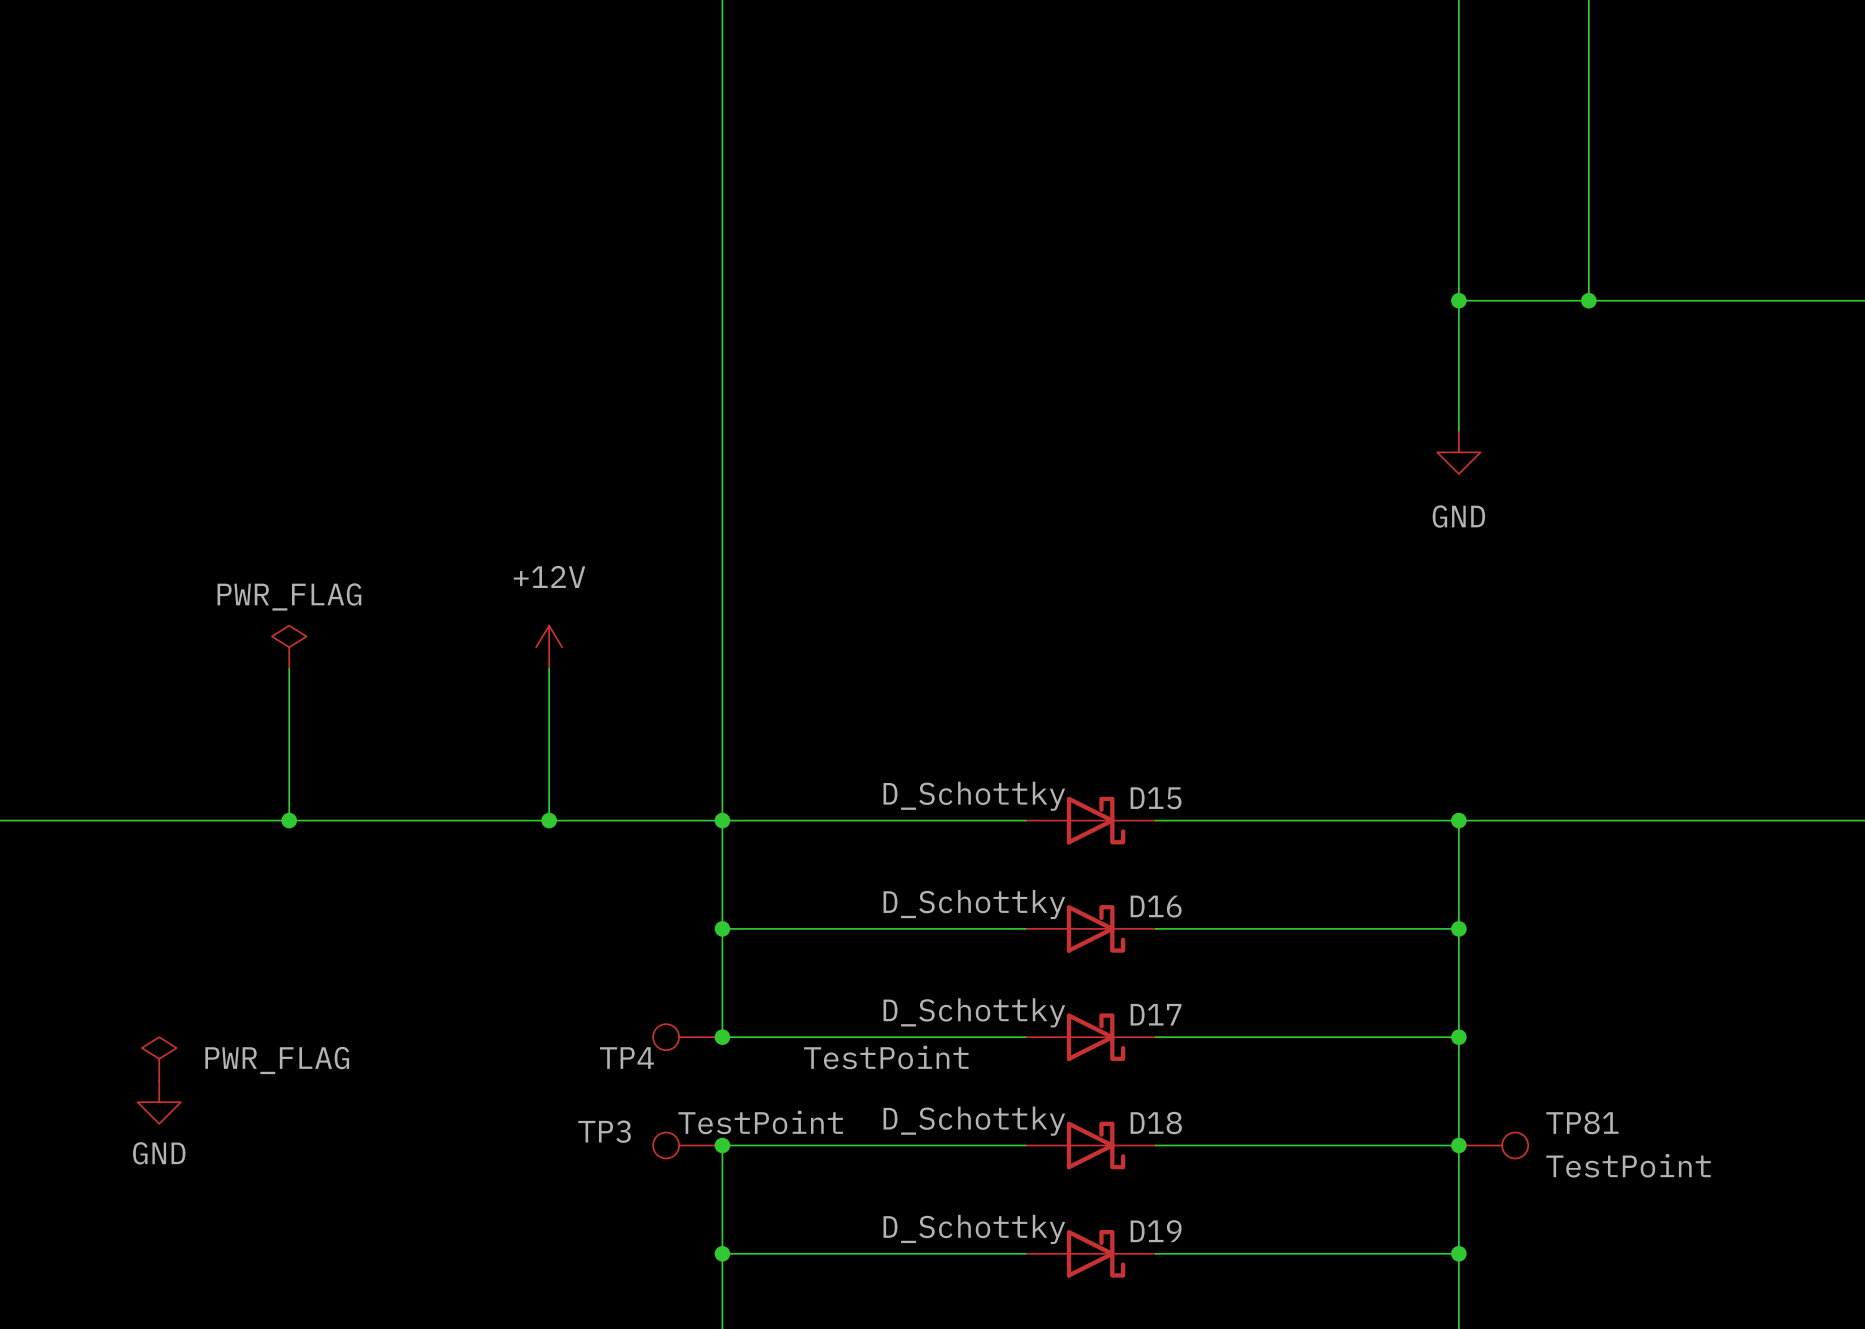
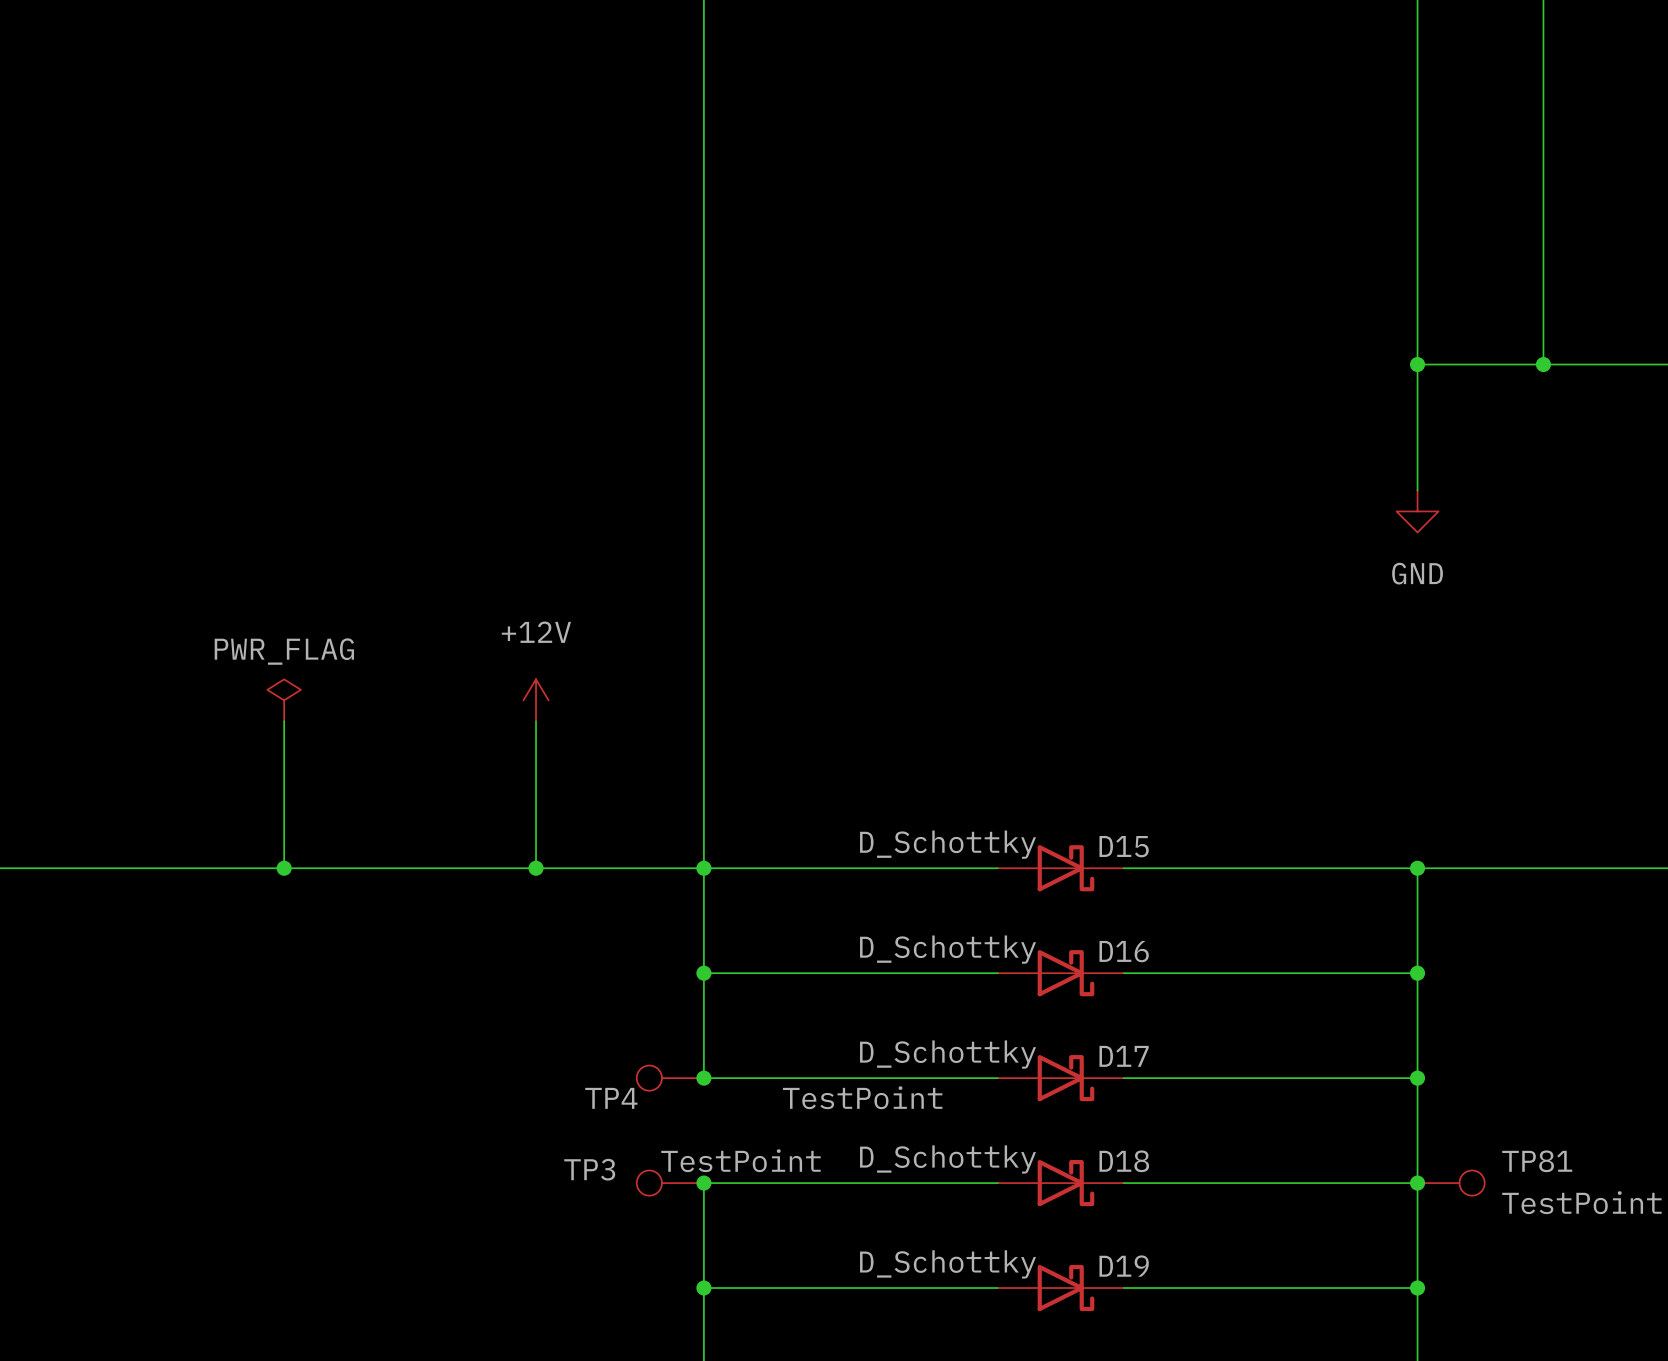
power symbol: PWR_FLAG (159, 1058) -> none
power symbol: GND (159, 1102) -> none

